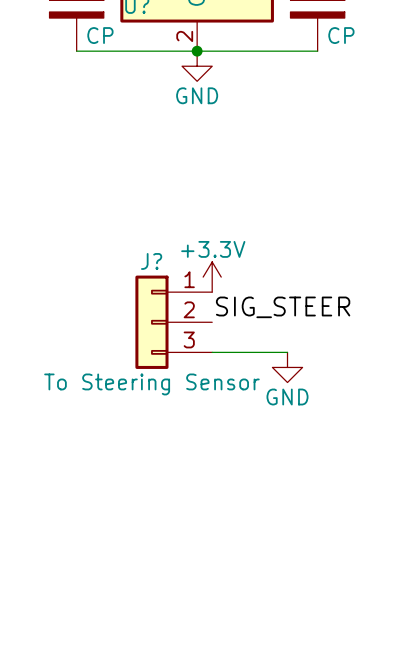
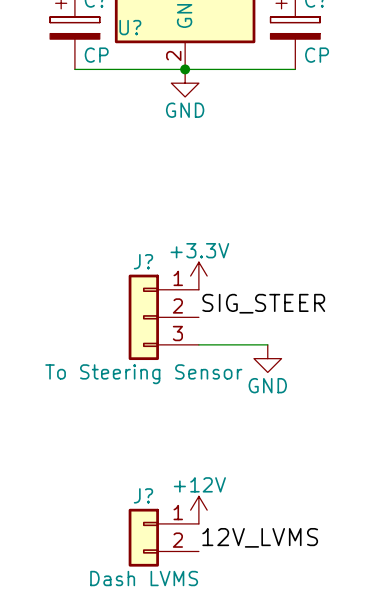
power symbol: none -> +12V (198, 510)
J?: none -> Dash LVMS (163, 537)
label: none -> 12V_LVMS (260, 537)

